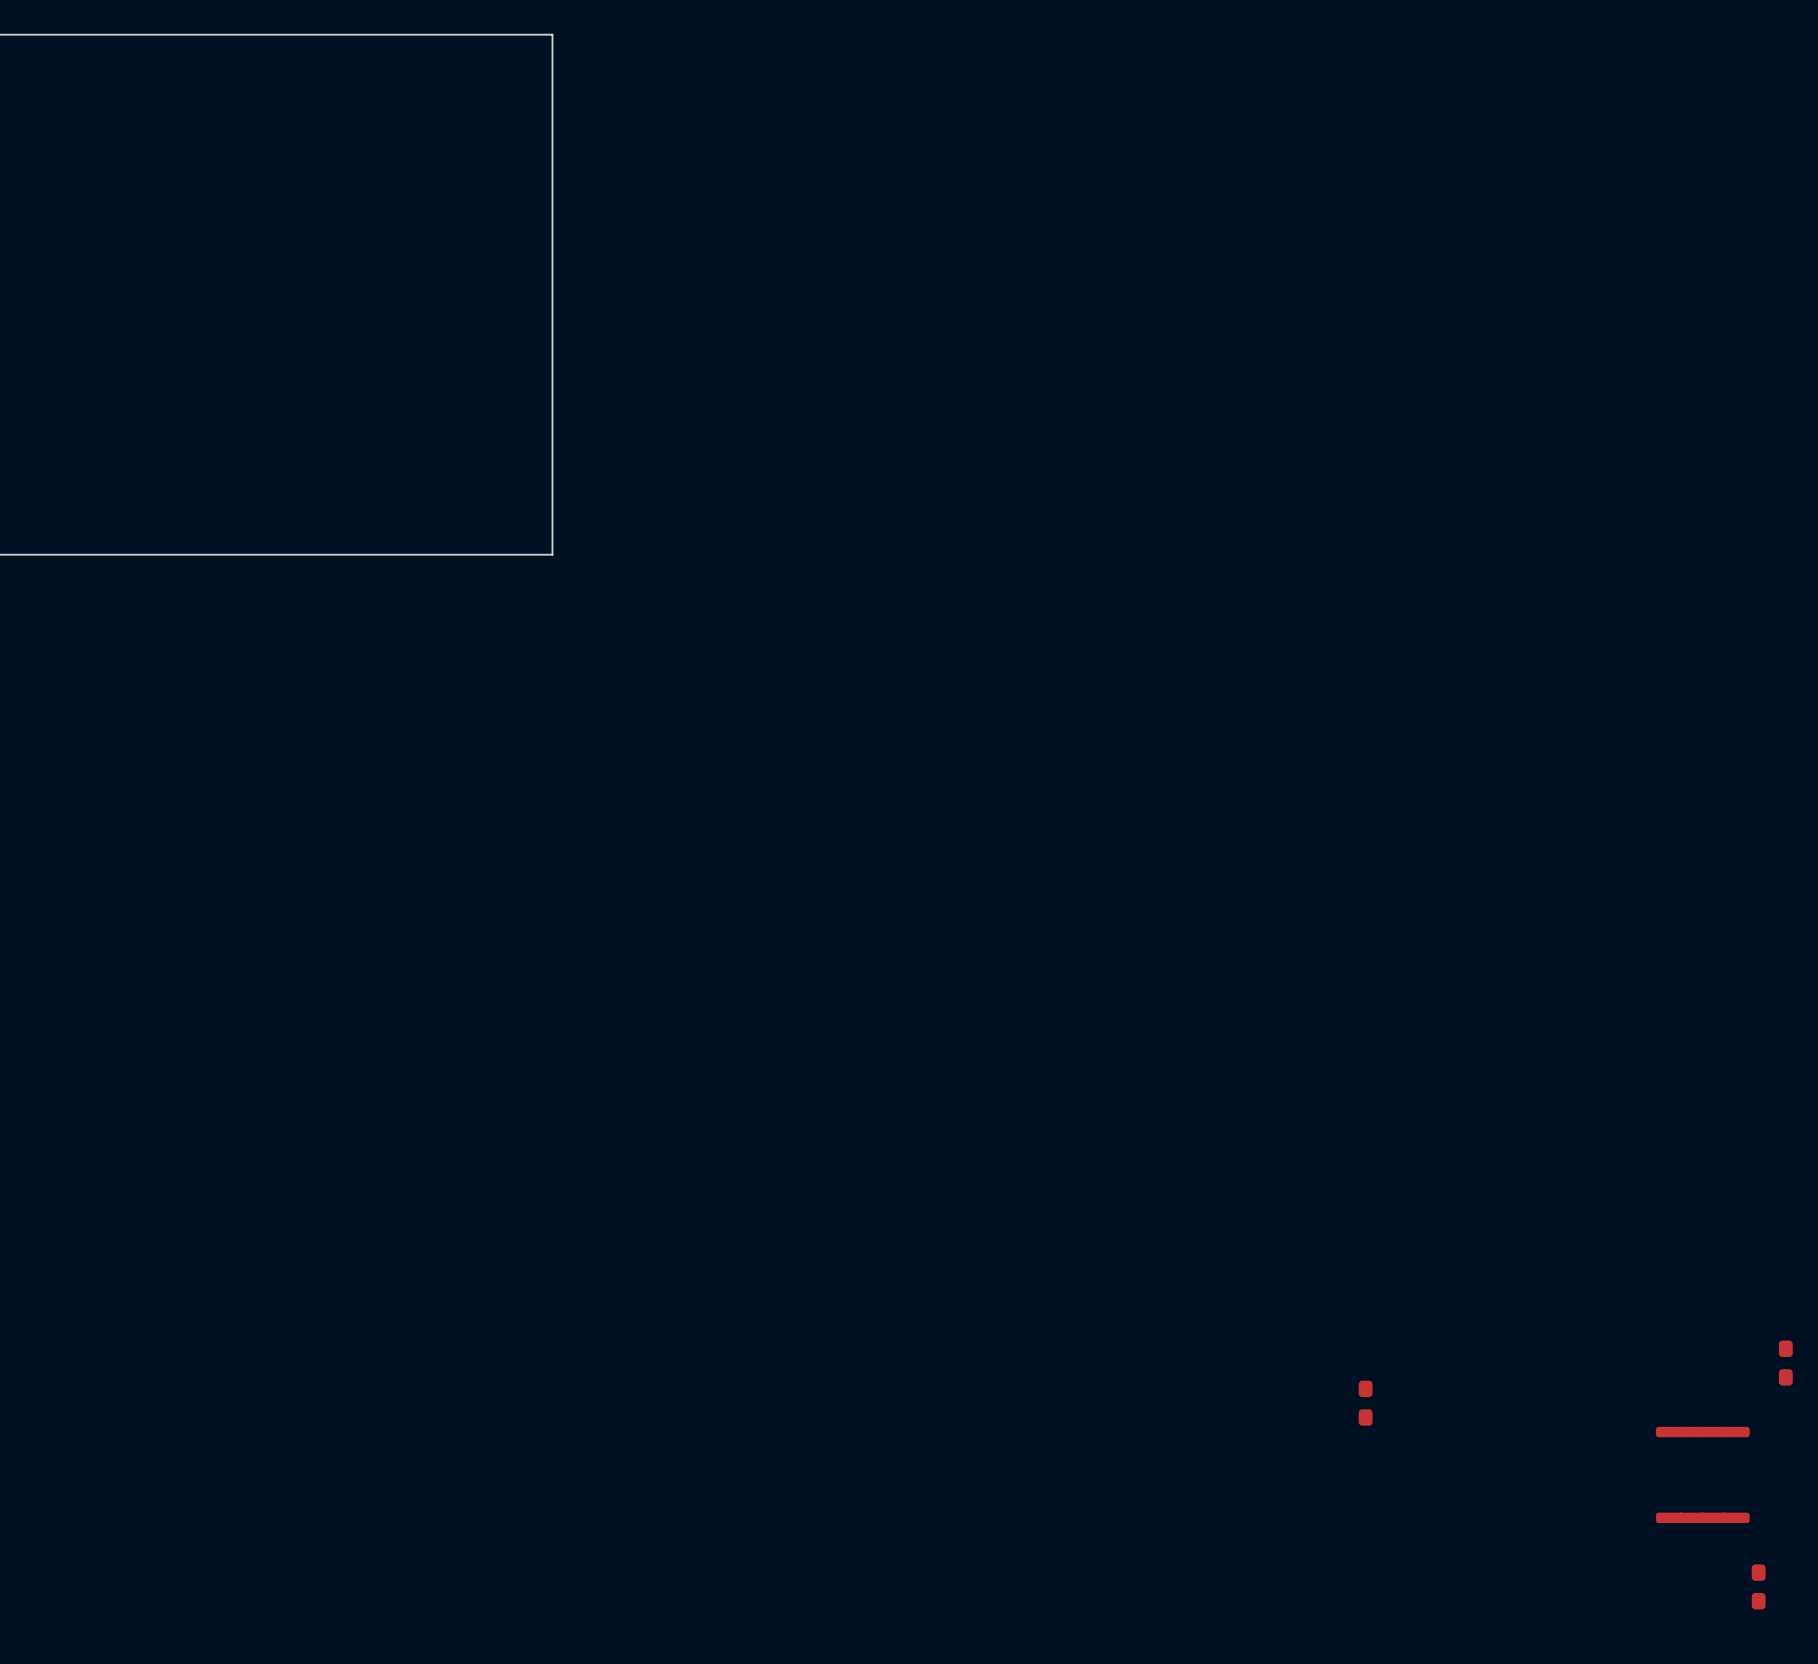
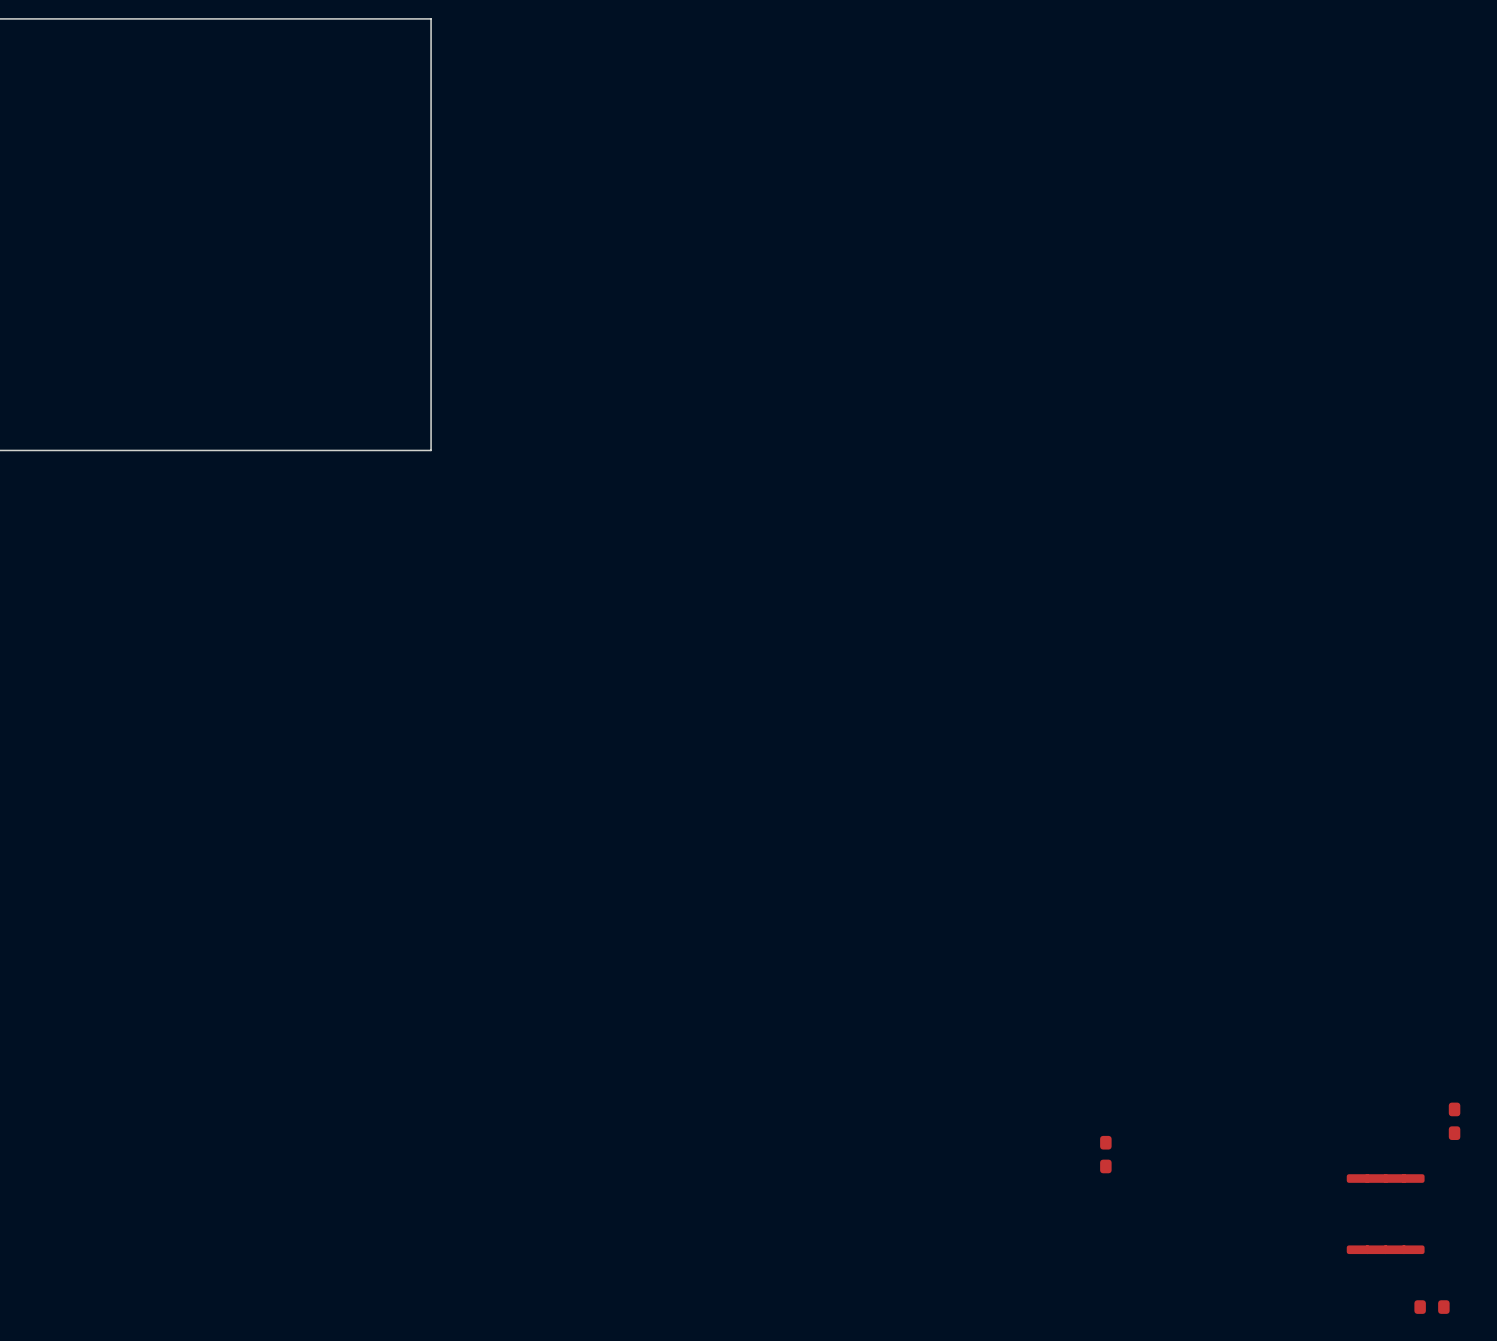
part footprint: [1751, 1564, 1766, 1610] -> [1414, 1300, 1450, 1314]

